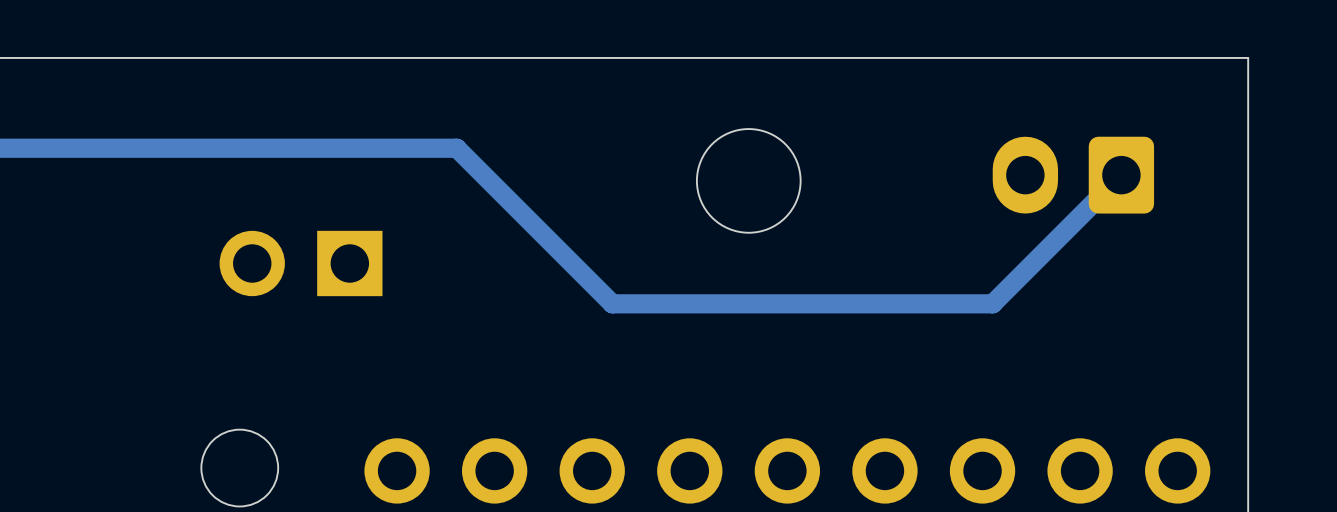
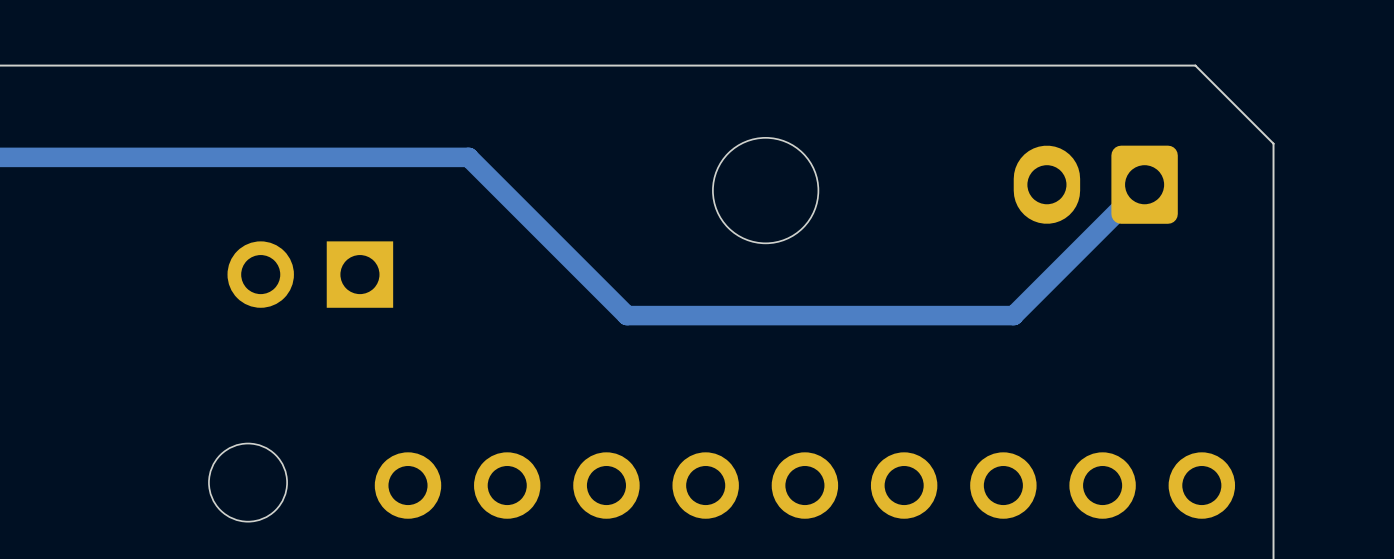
board edge: (1171, 57) (1248, 57) (1248, 134) -> (1195, 65) (1273, 143)

